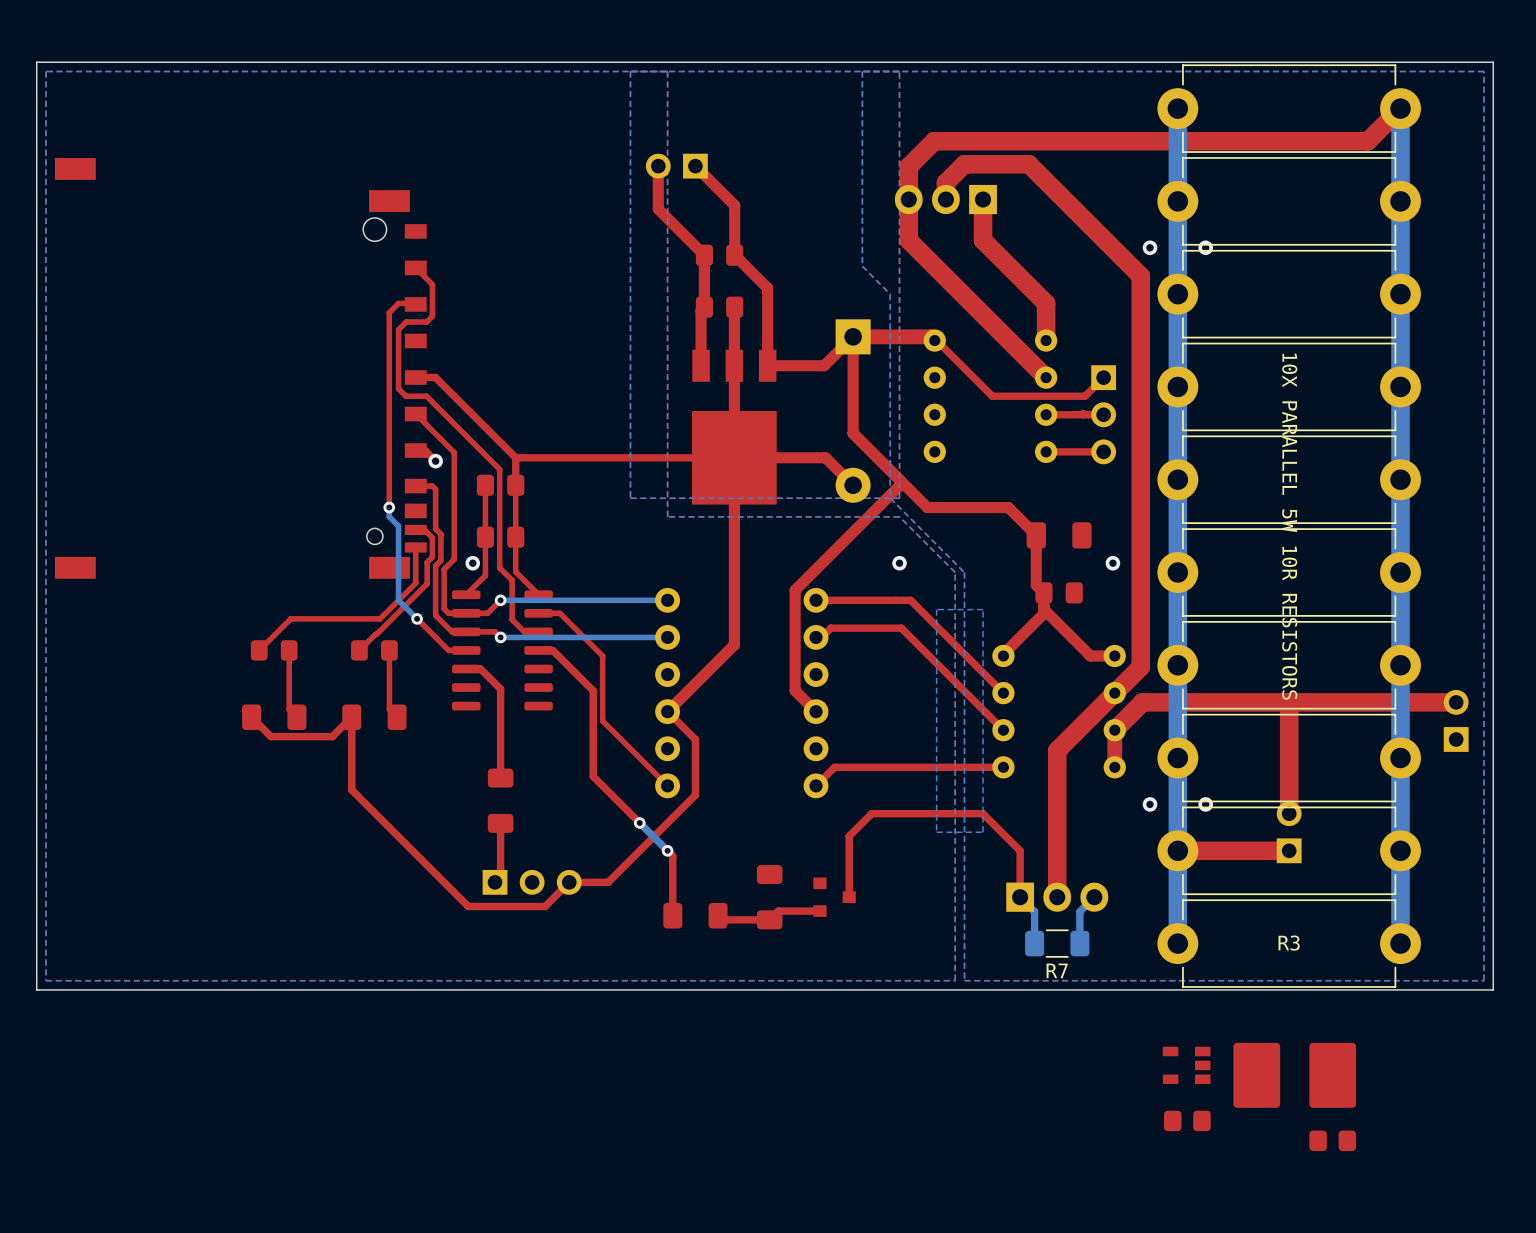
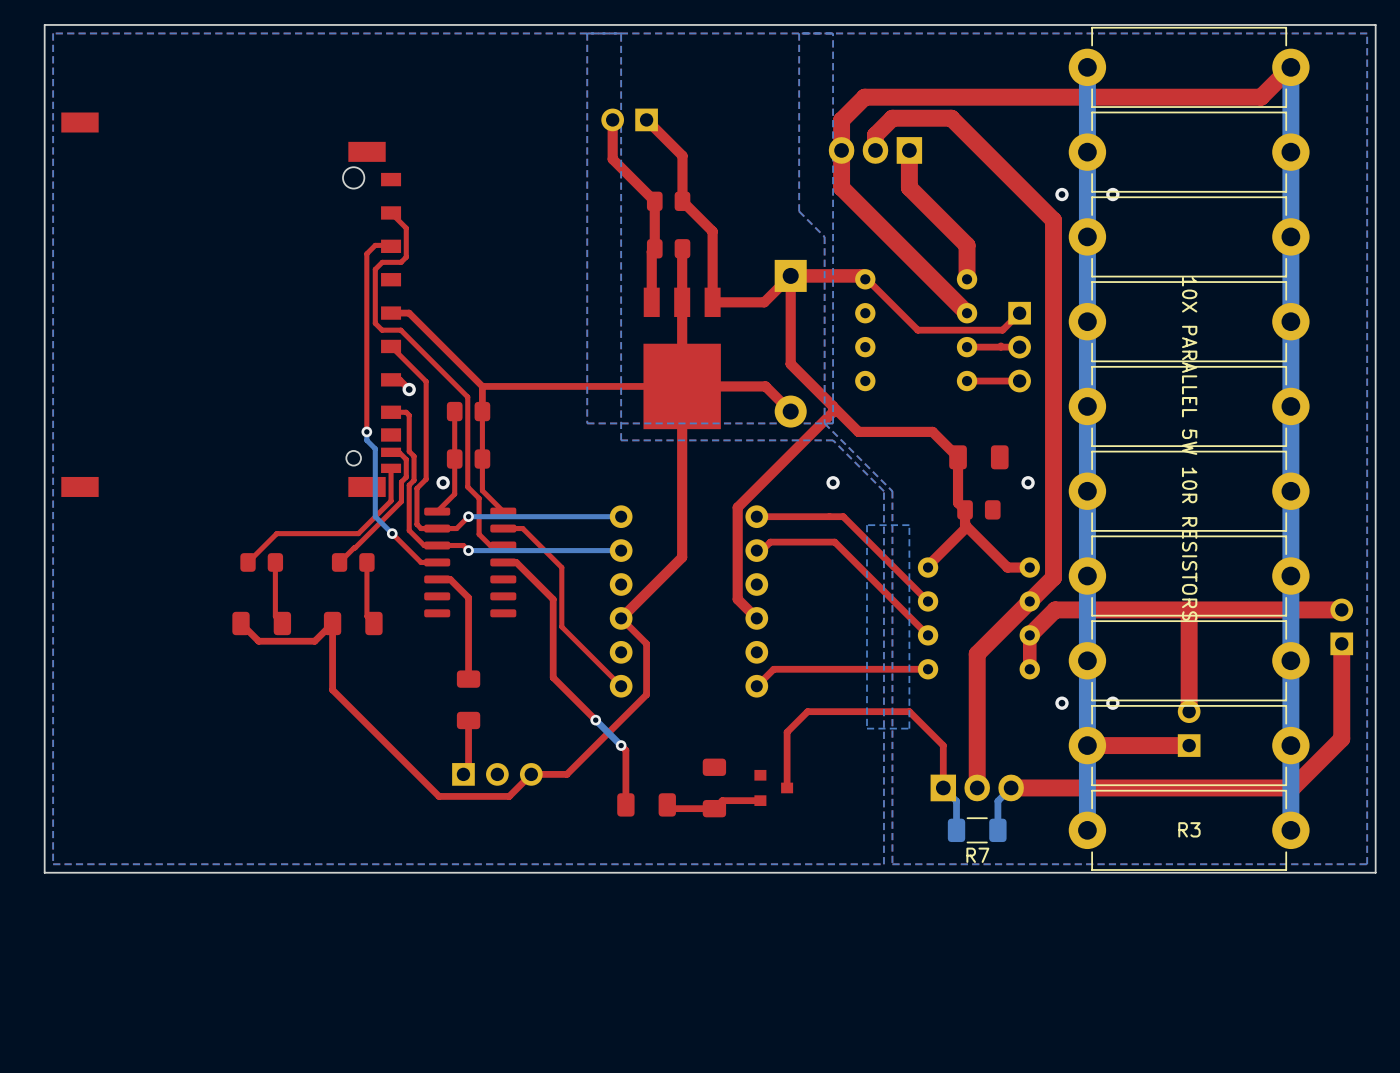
top track: none -> (1341, 643) (1341, 738) (1292, 787) (1011, 787)
part: (1186, 1065) -> none
part: (1294, 1075) -> none
part: (1187, 1120) -> none
part: (1332, 1140) -> none

